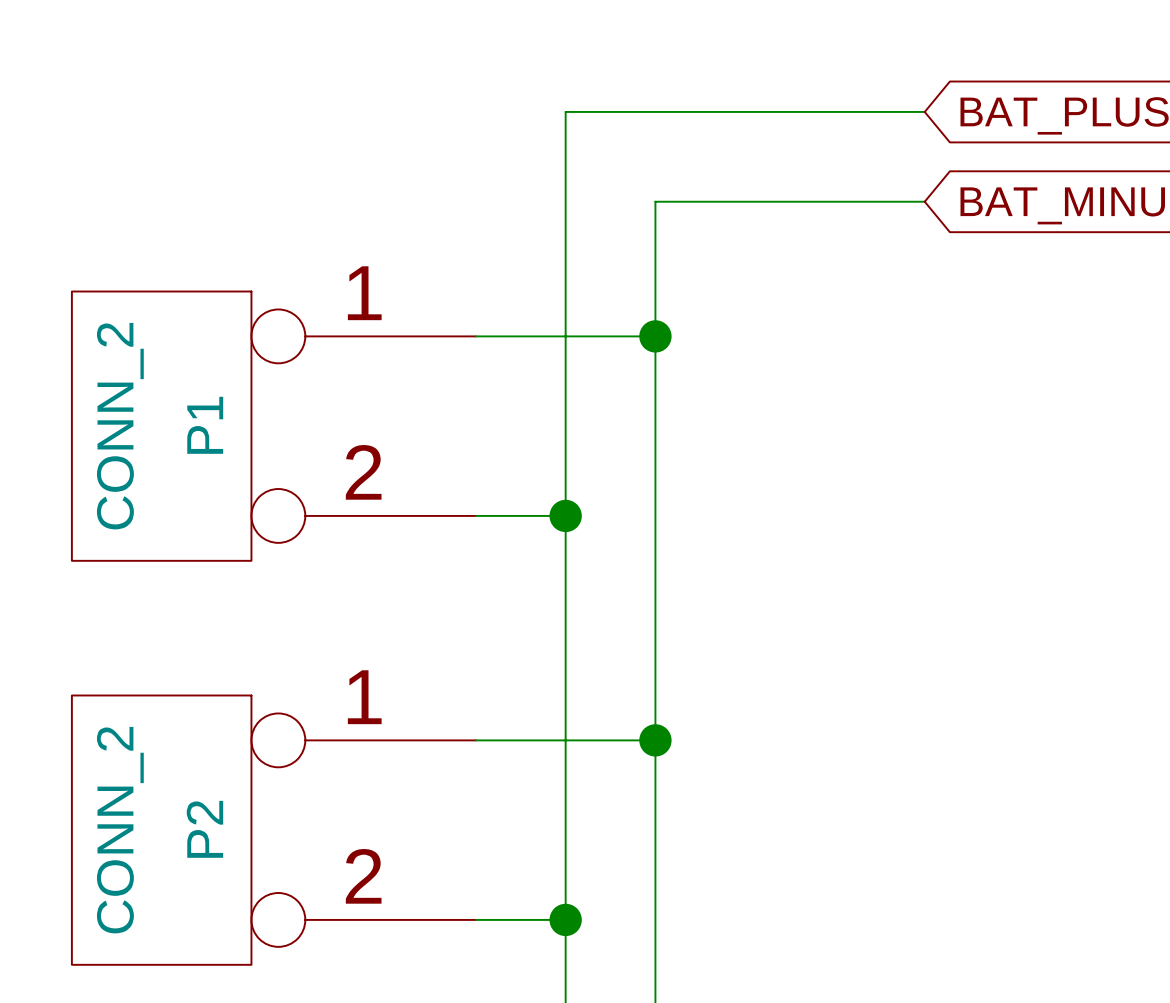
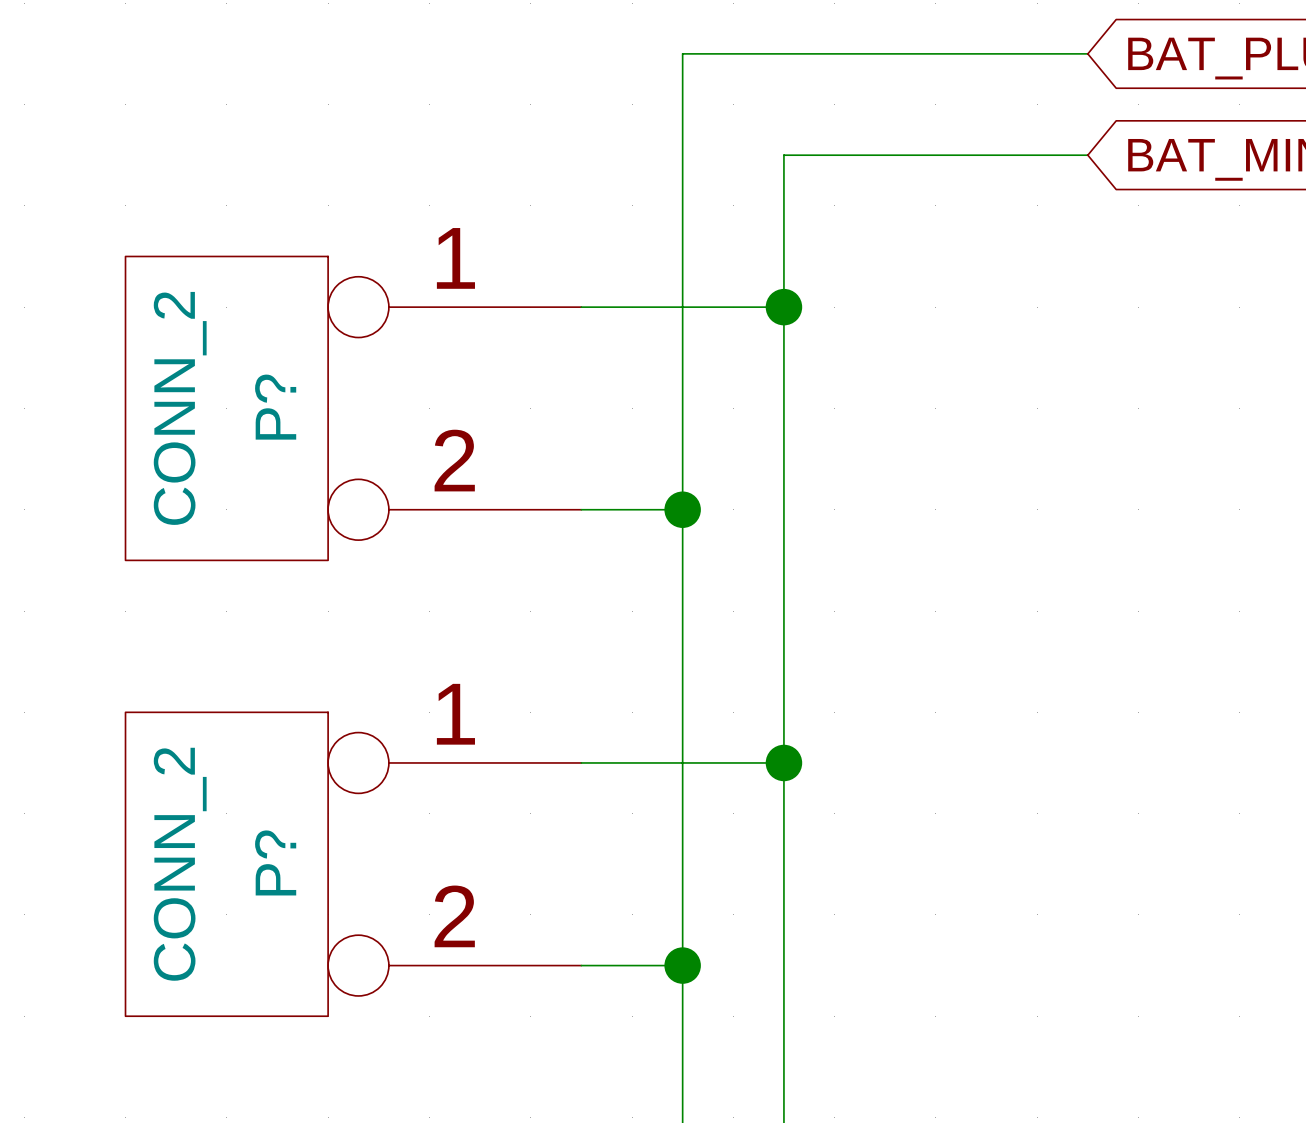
P1 name: P1 (205, 425) -> P? (275, 407)
P2 name: P2 (204, 829) -> P? (275, 862)

